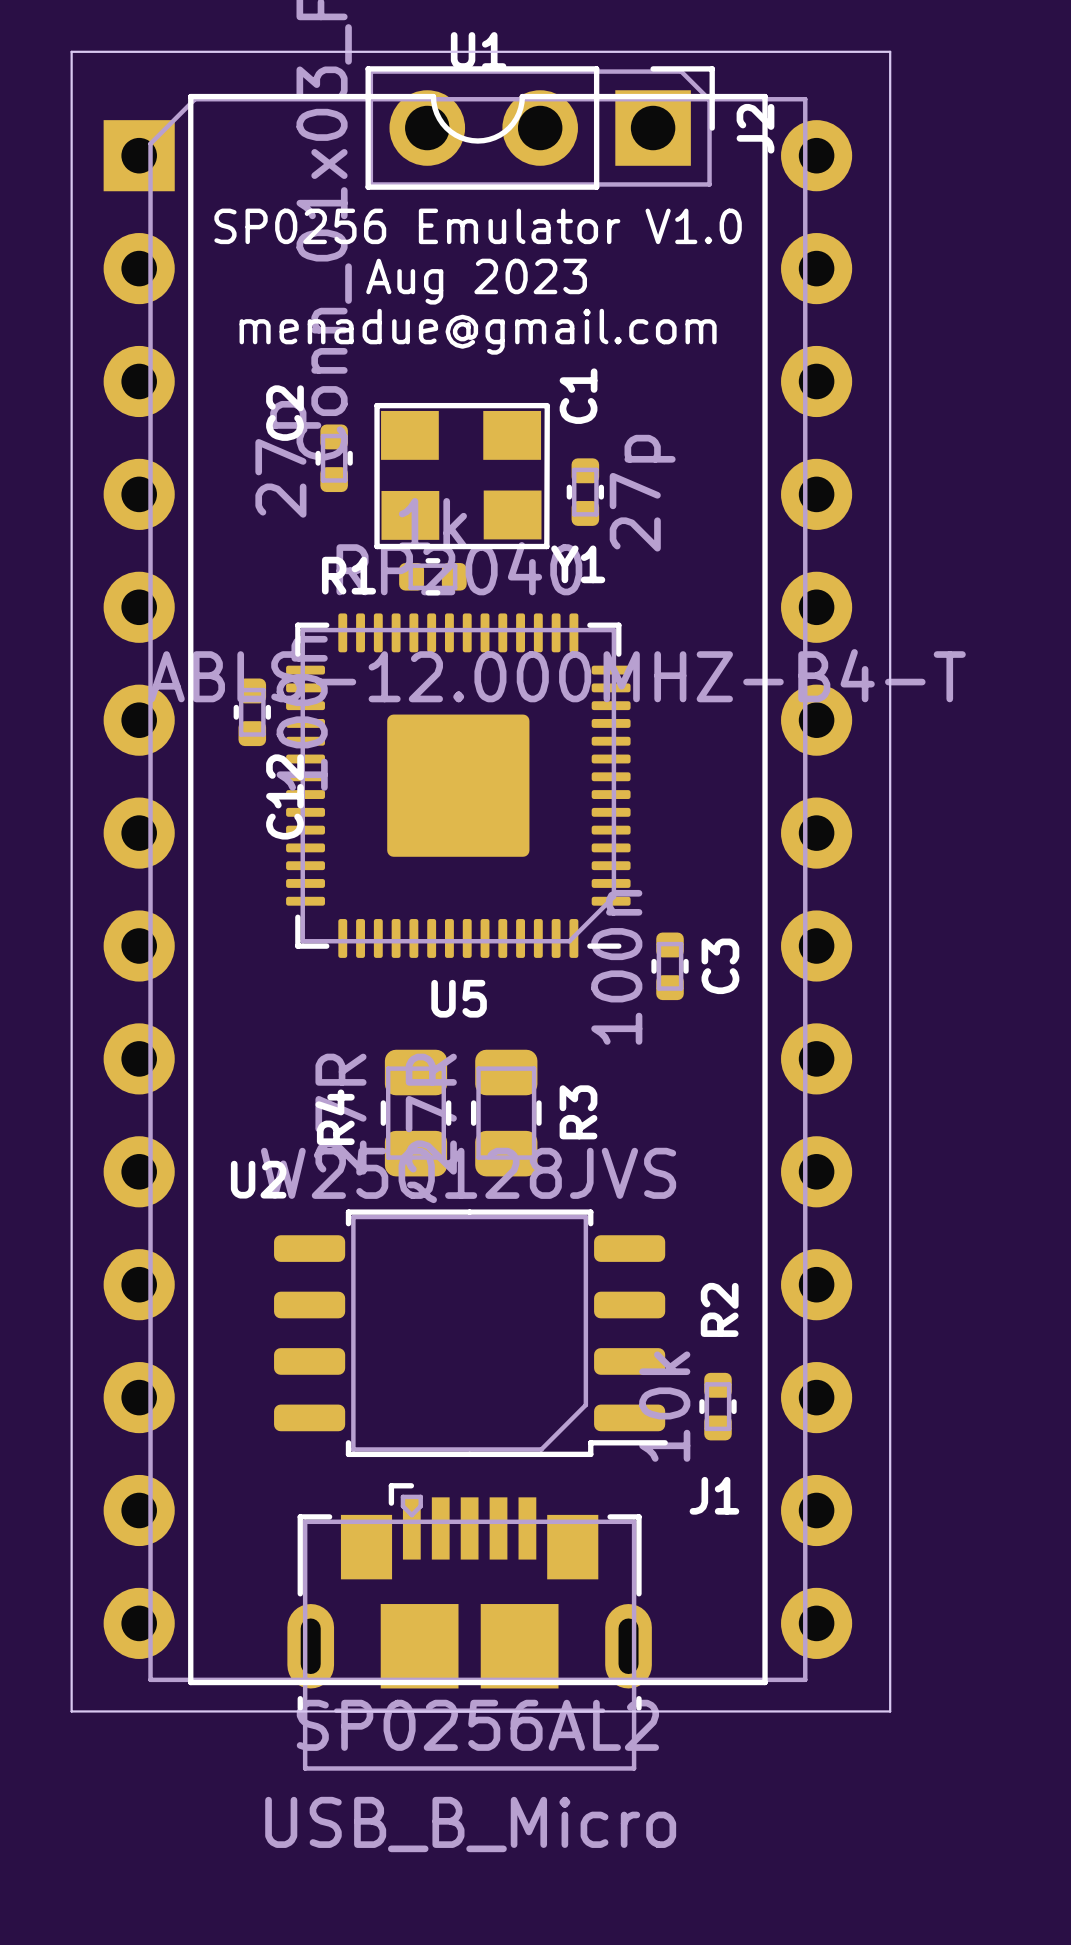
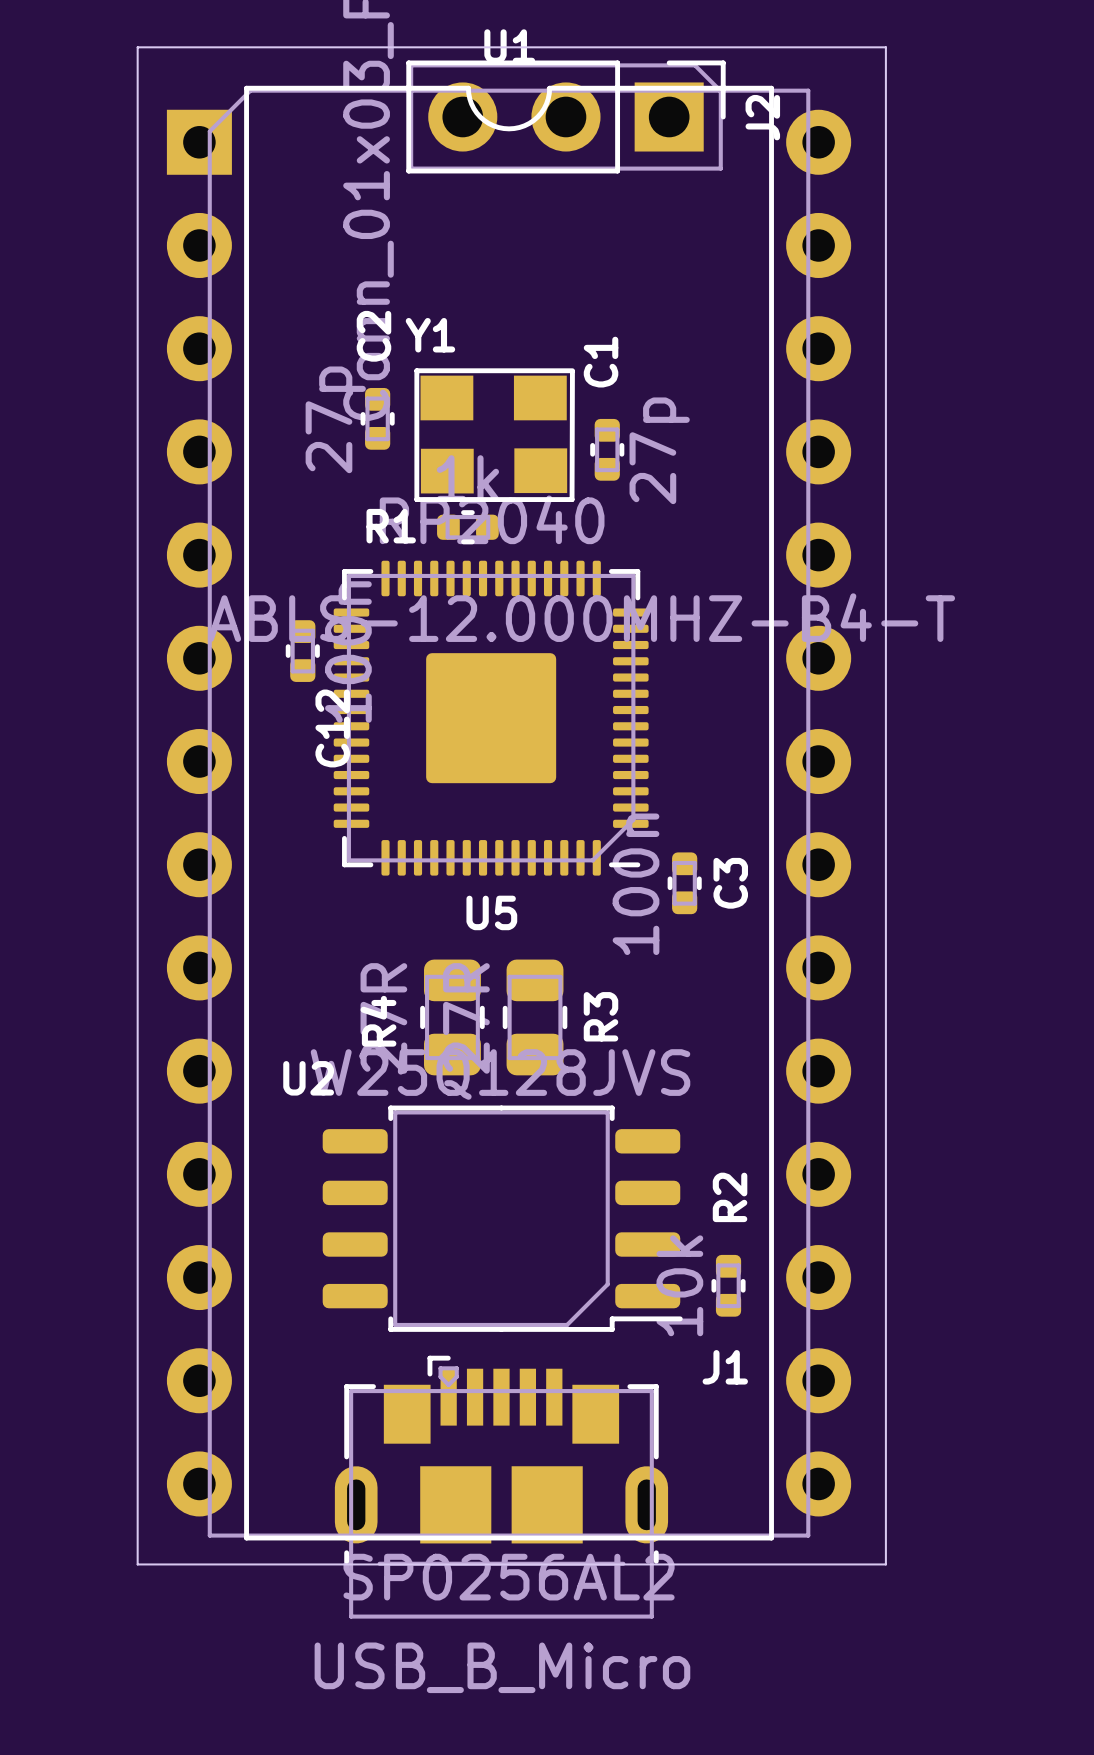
text: SP0256 Emulator V1.0 (478, 226) -> none
text: Aug 2023 (476, 281) -> none
text: menadue@gmail.com (478, 331) -> none
C2 name position: C2 (284, 413) -> C2 (373, 336)
Y1 name position: Y1 (578, 564) -> Y1 (430, 335)

